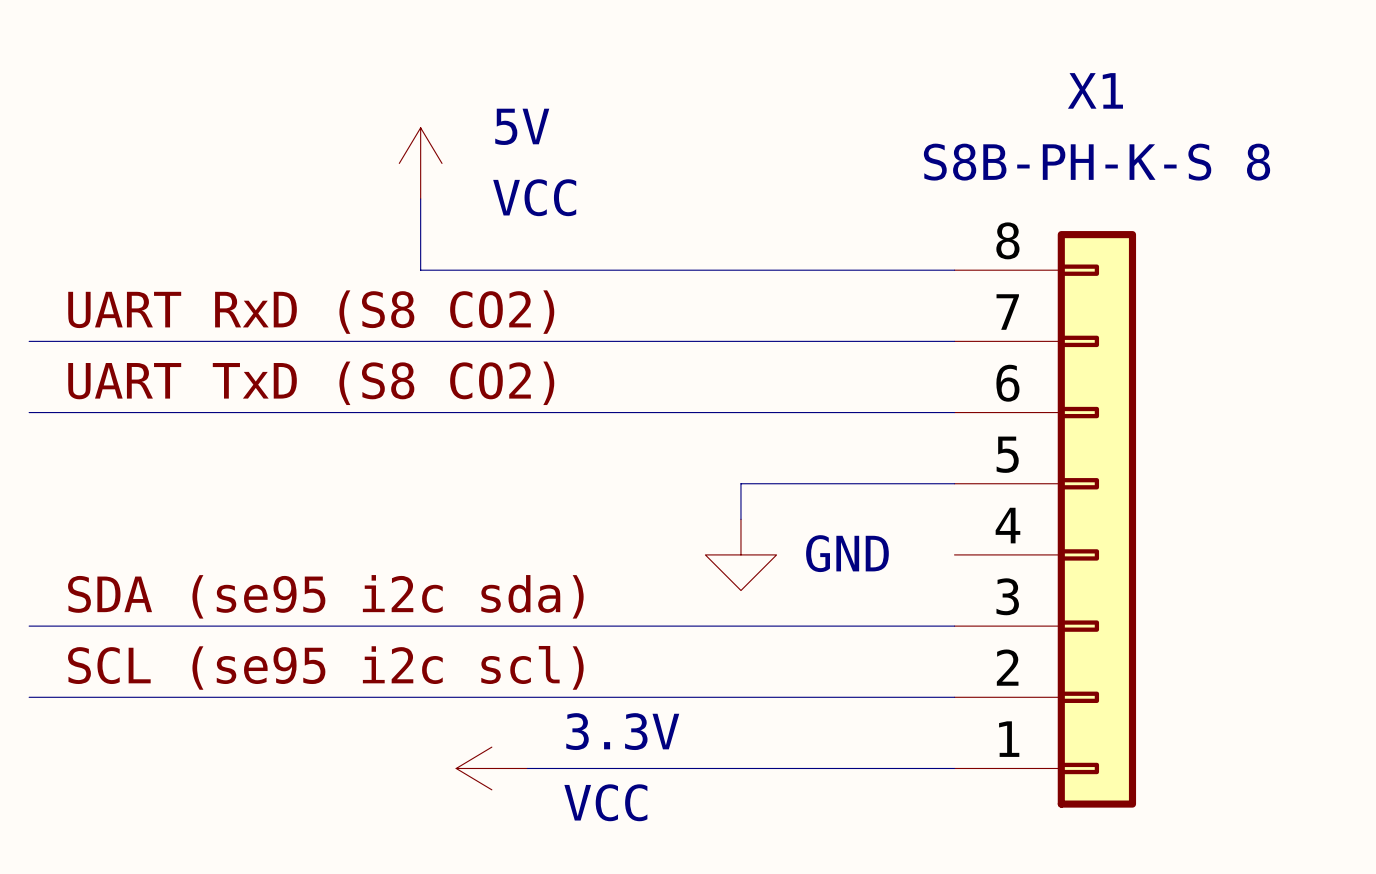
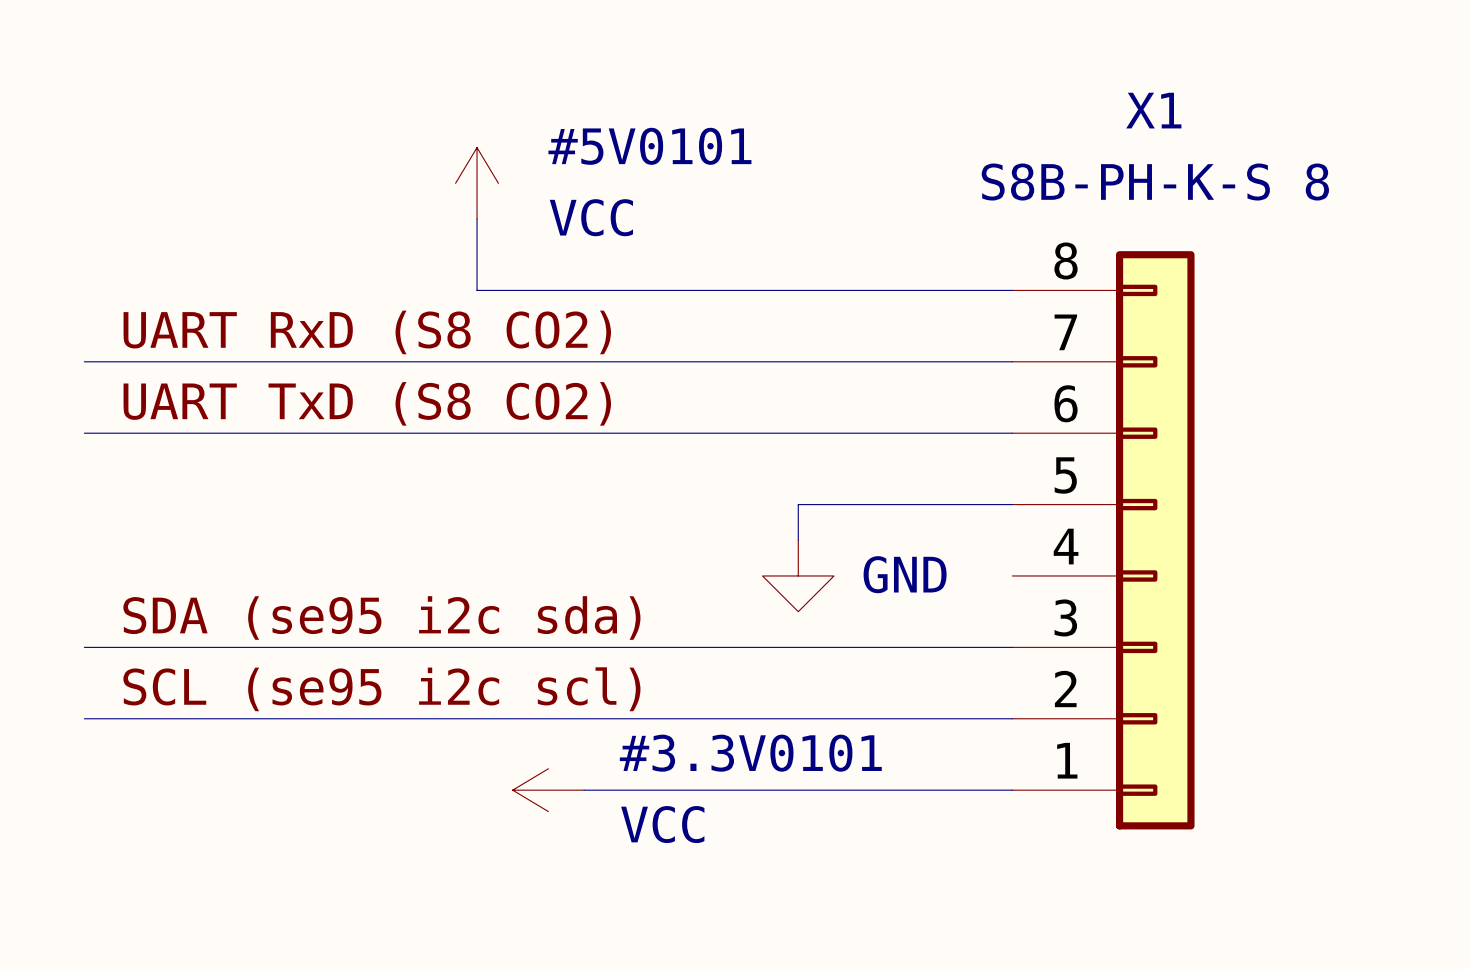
5V name: 5V (522, 126) -> #5V0101 (649, 146)
3.3V name: 3.3V (622, 731) -> #3.3V0101 (750, 753)

